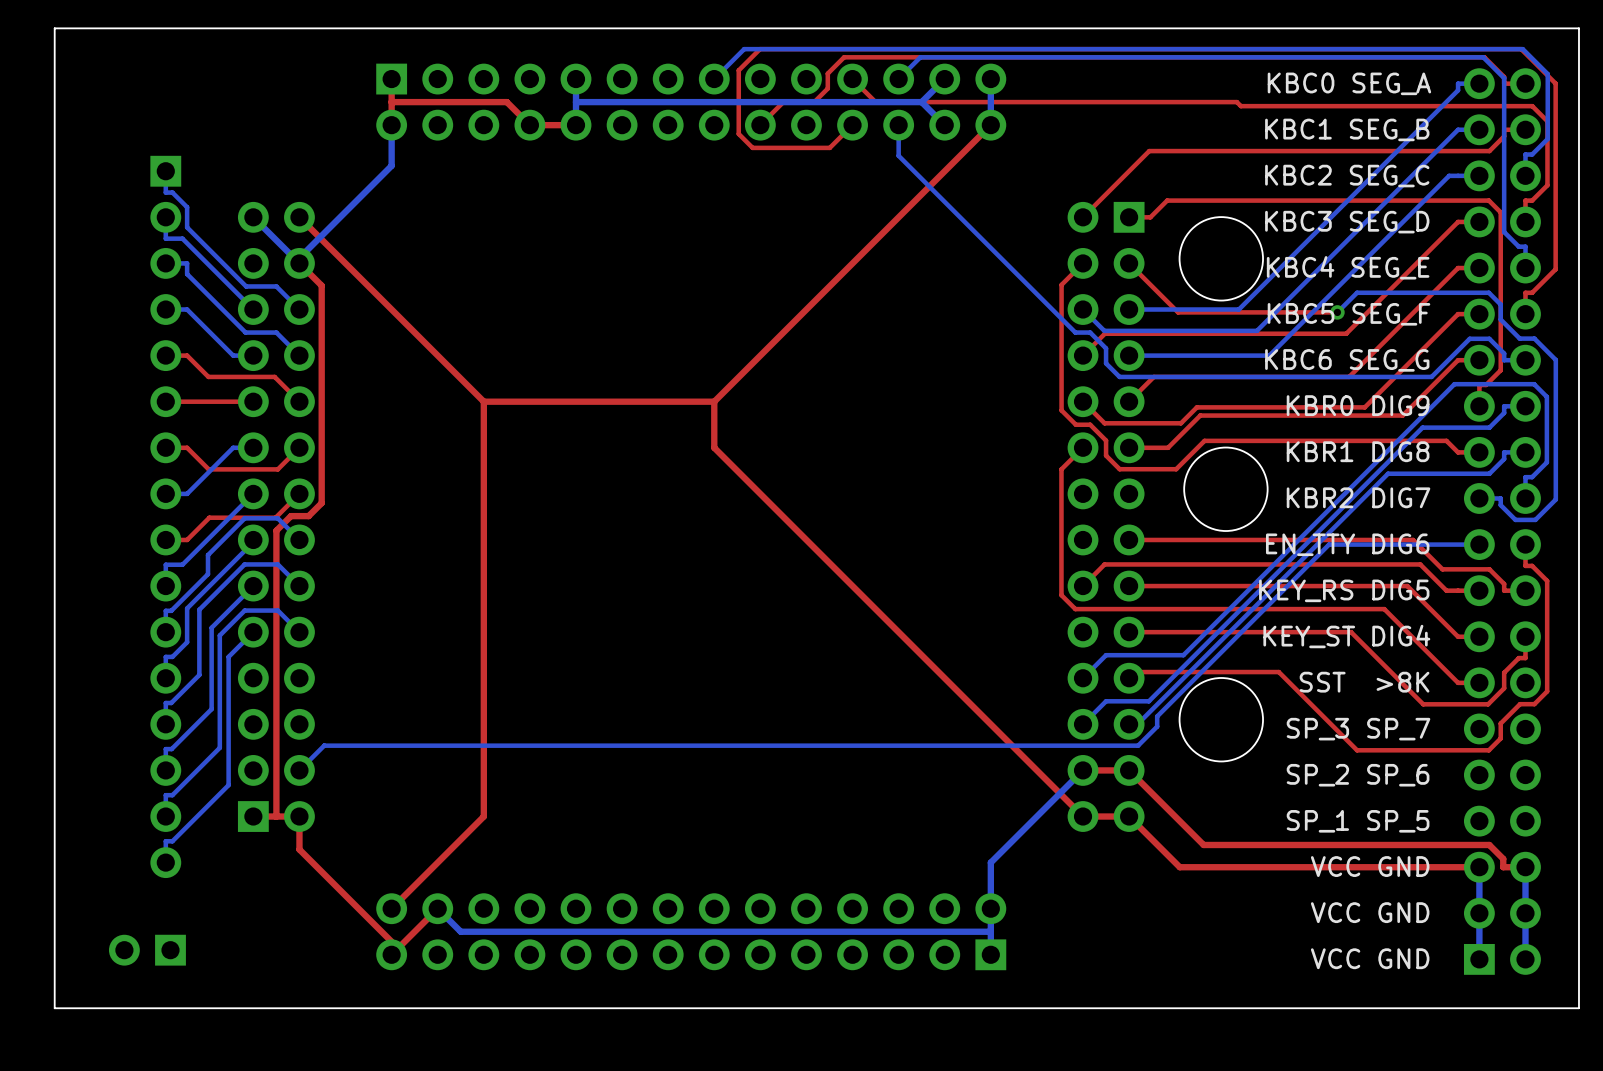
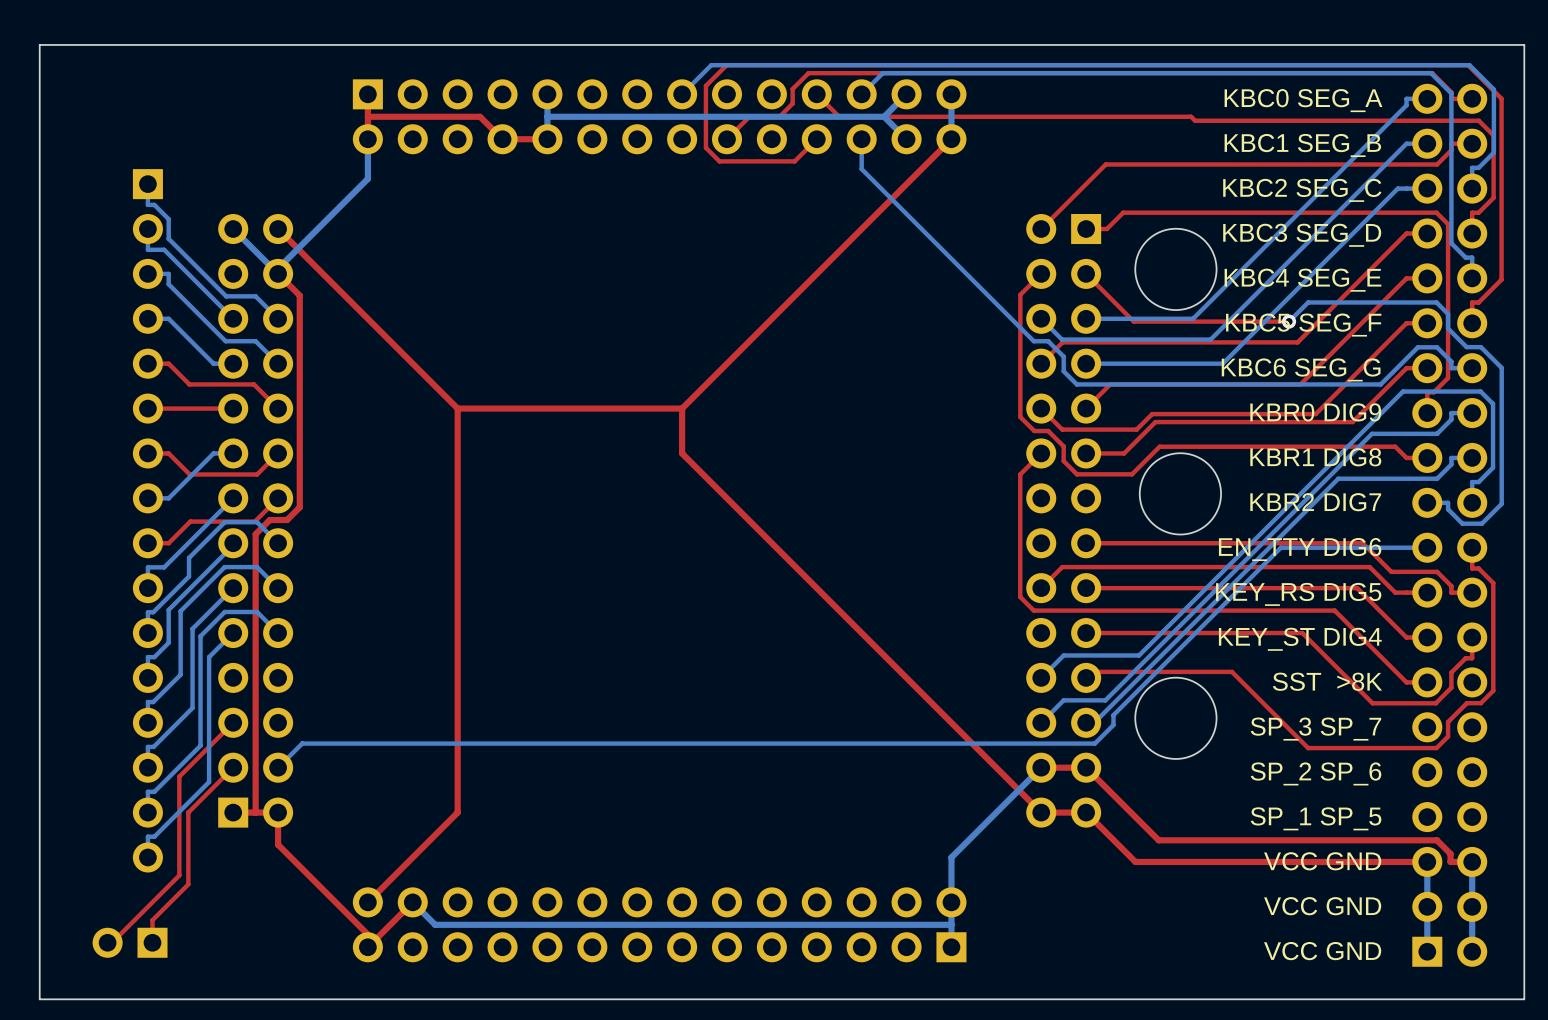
top track: none -> (233, 722) (179, 776) (179, 875) (112, 942) (107, 942)
top track: none -> (233, 767) (188, 812) (188, 884) (152, 920) (152, 942)

